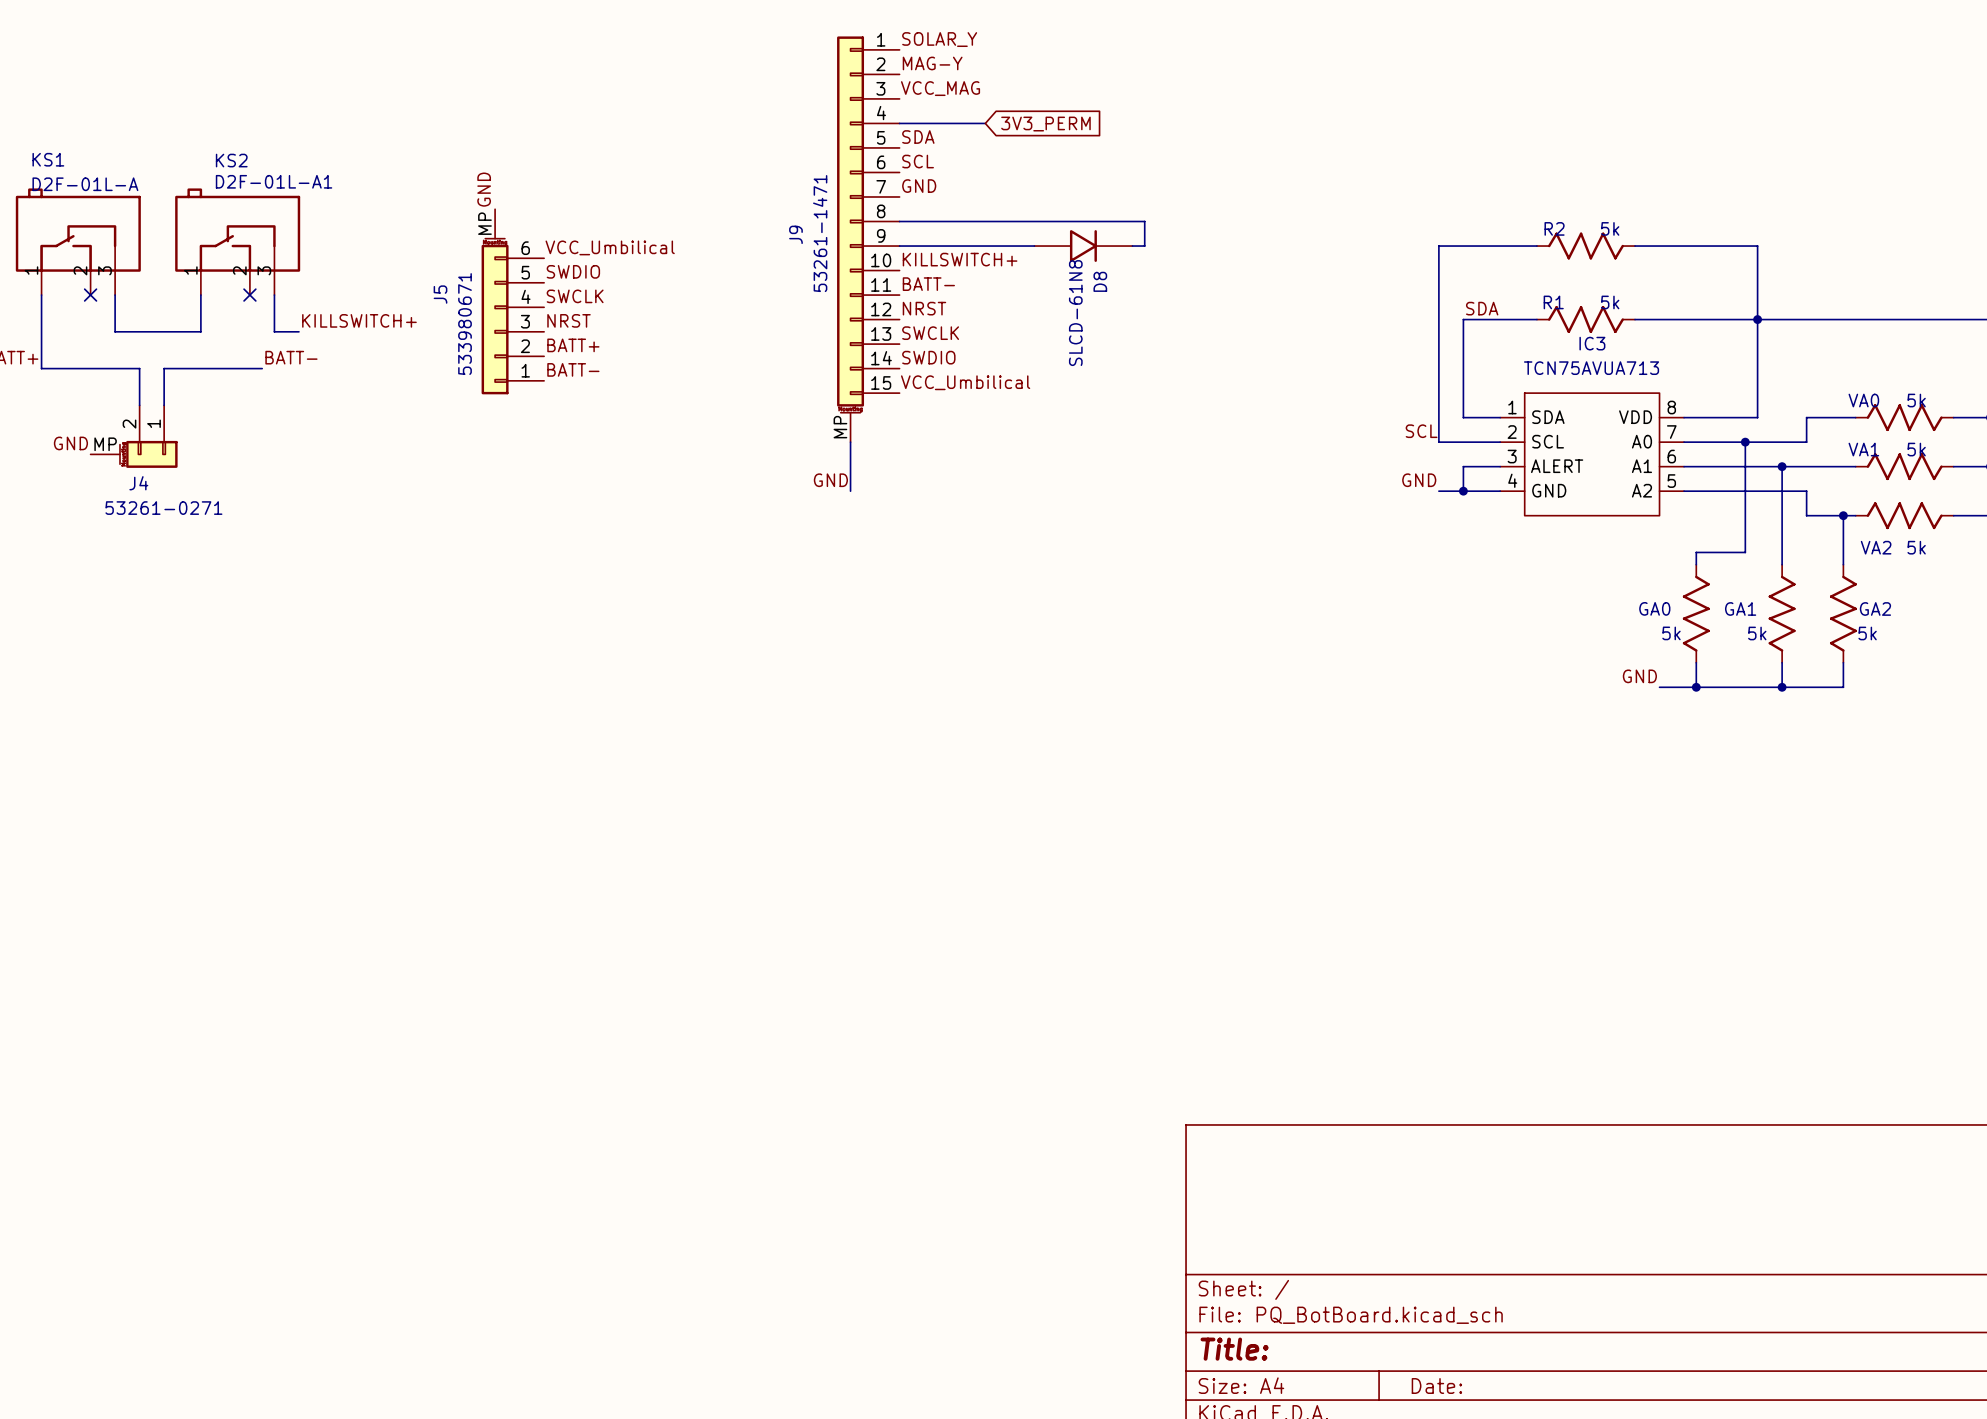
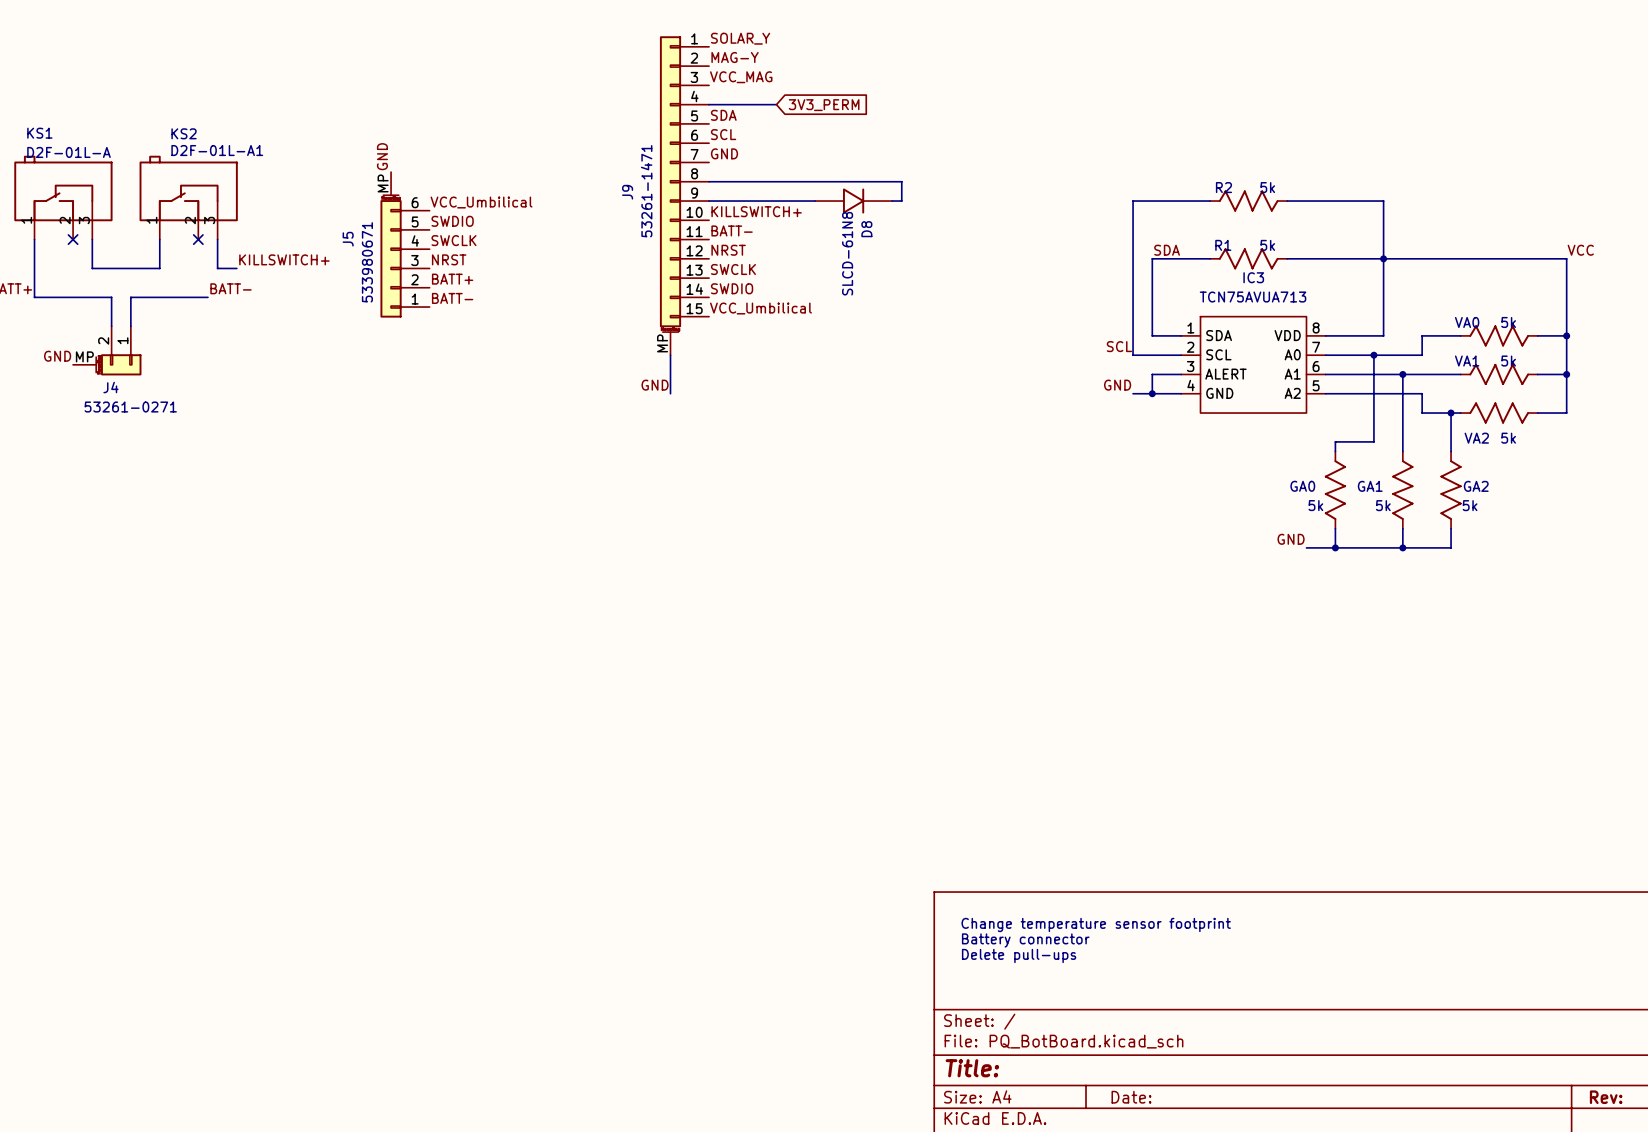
text: none -> Change temperature sensor footprint (1096, 924)
text: none -> Battery connector (1025, 940)
text: none -> Delete pull-ups (1019, 955)

